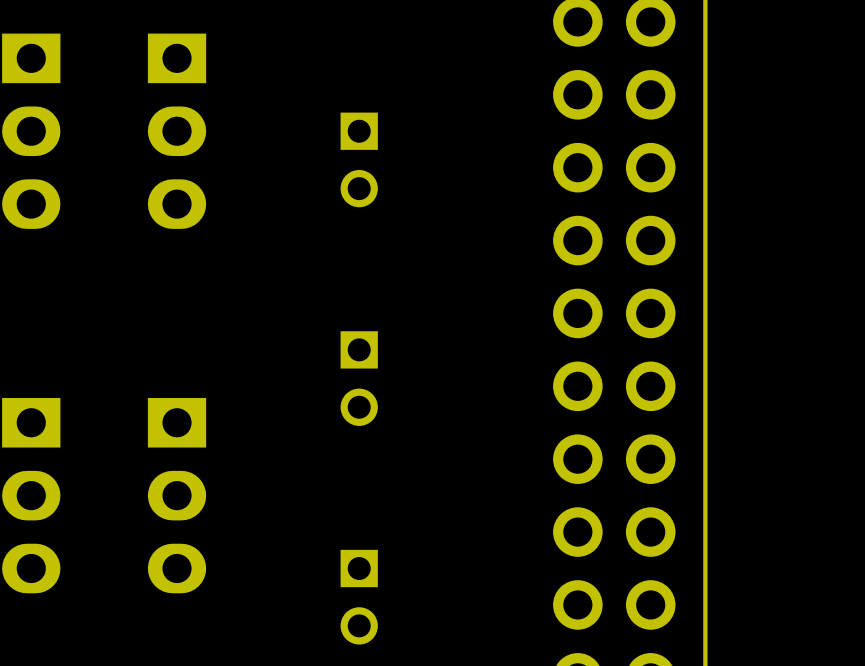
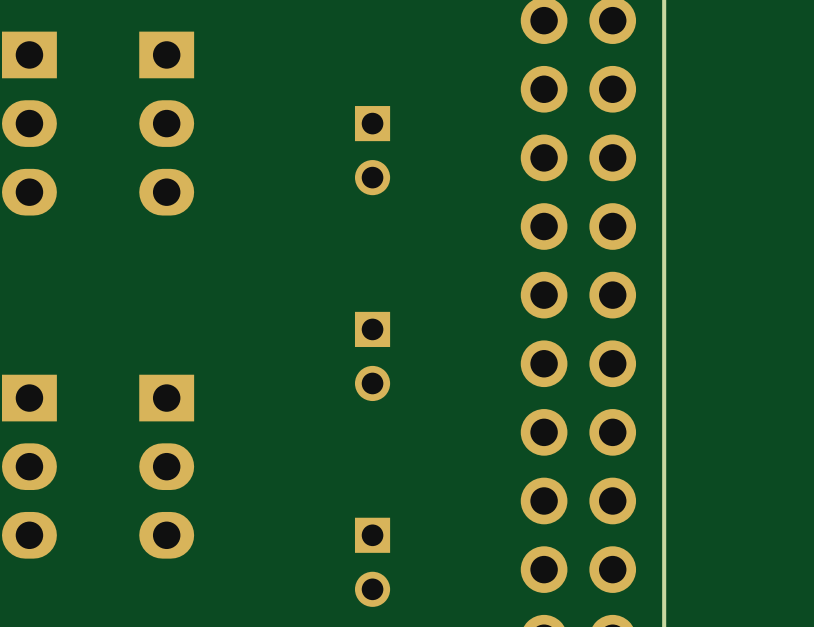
part position: (359, 159) -> (372, 150)
part position: (359, 378) -> (372, 356)
part position: (359, 597) -> (372, 562)

